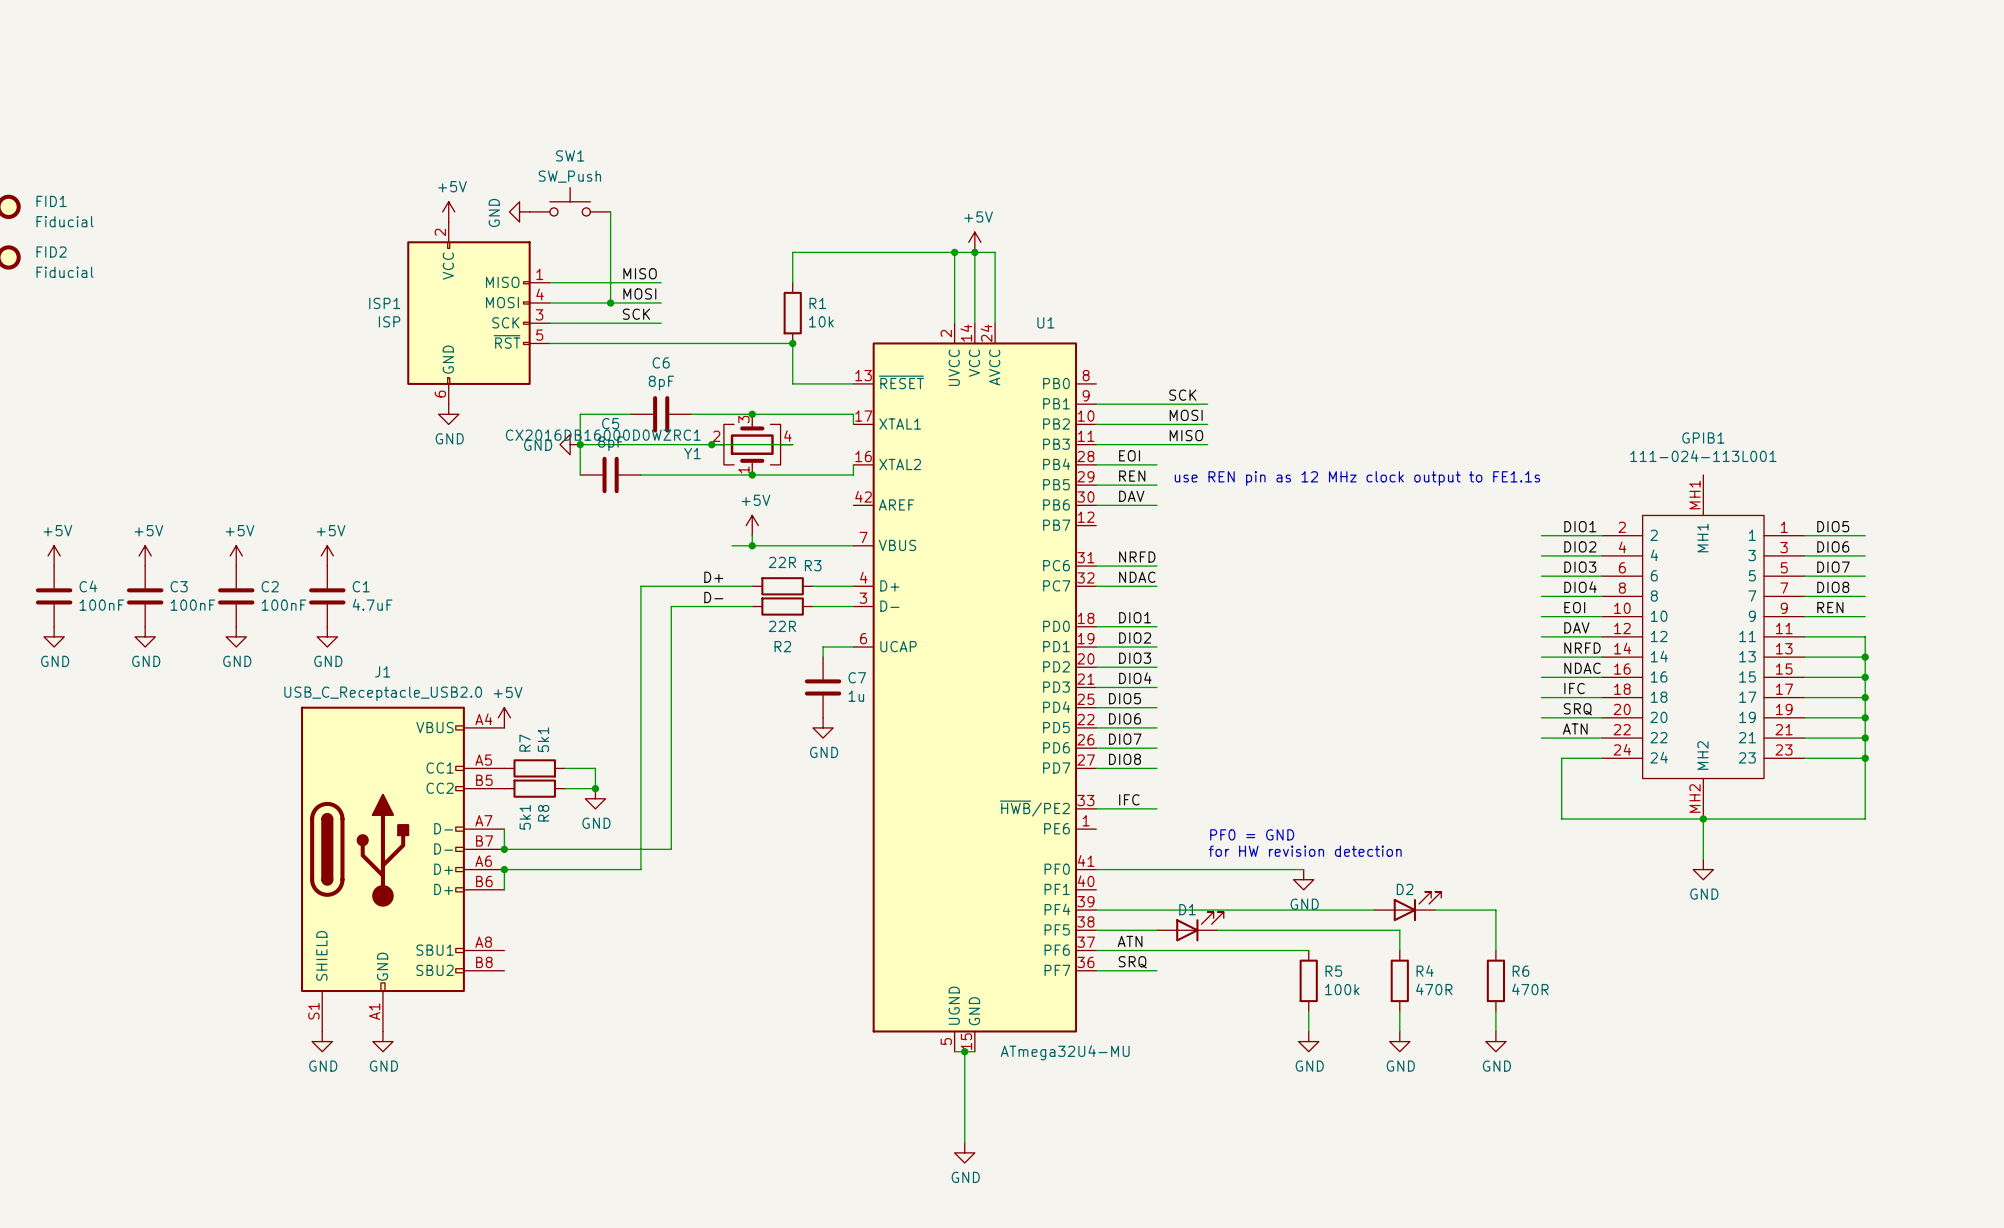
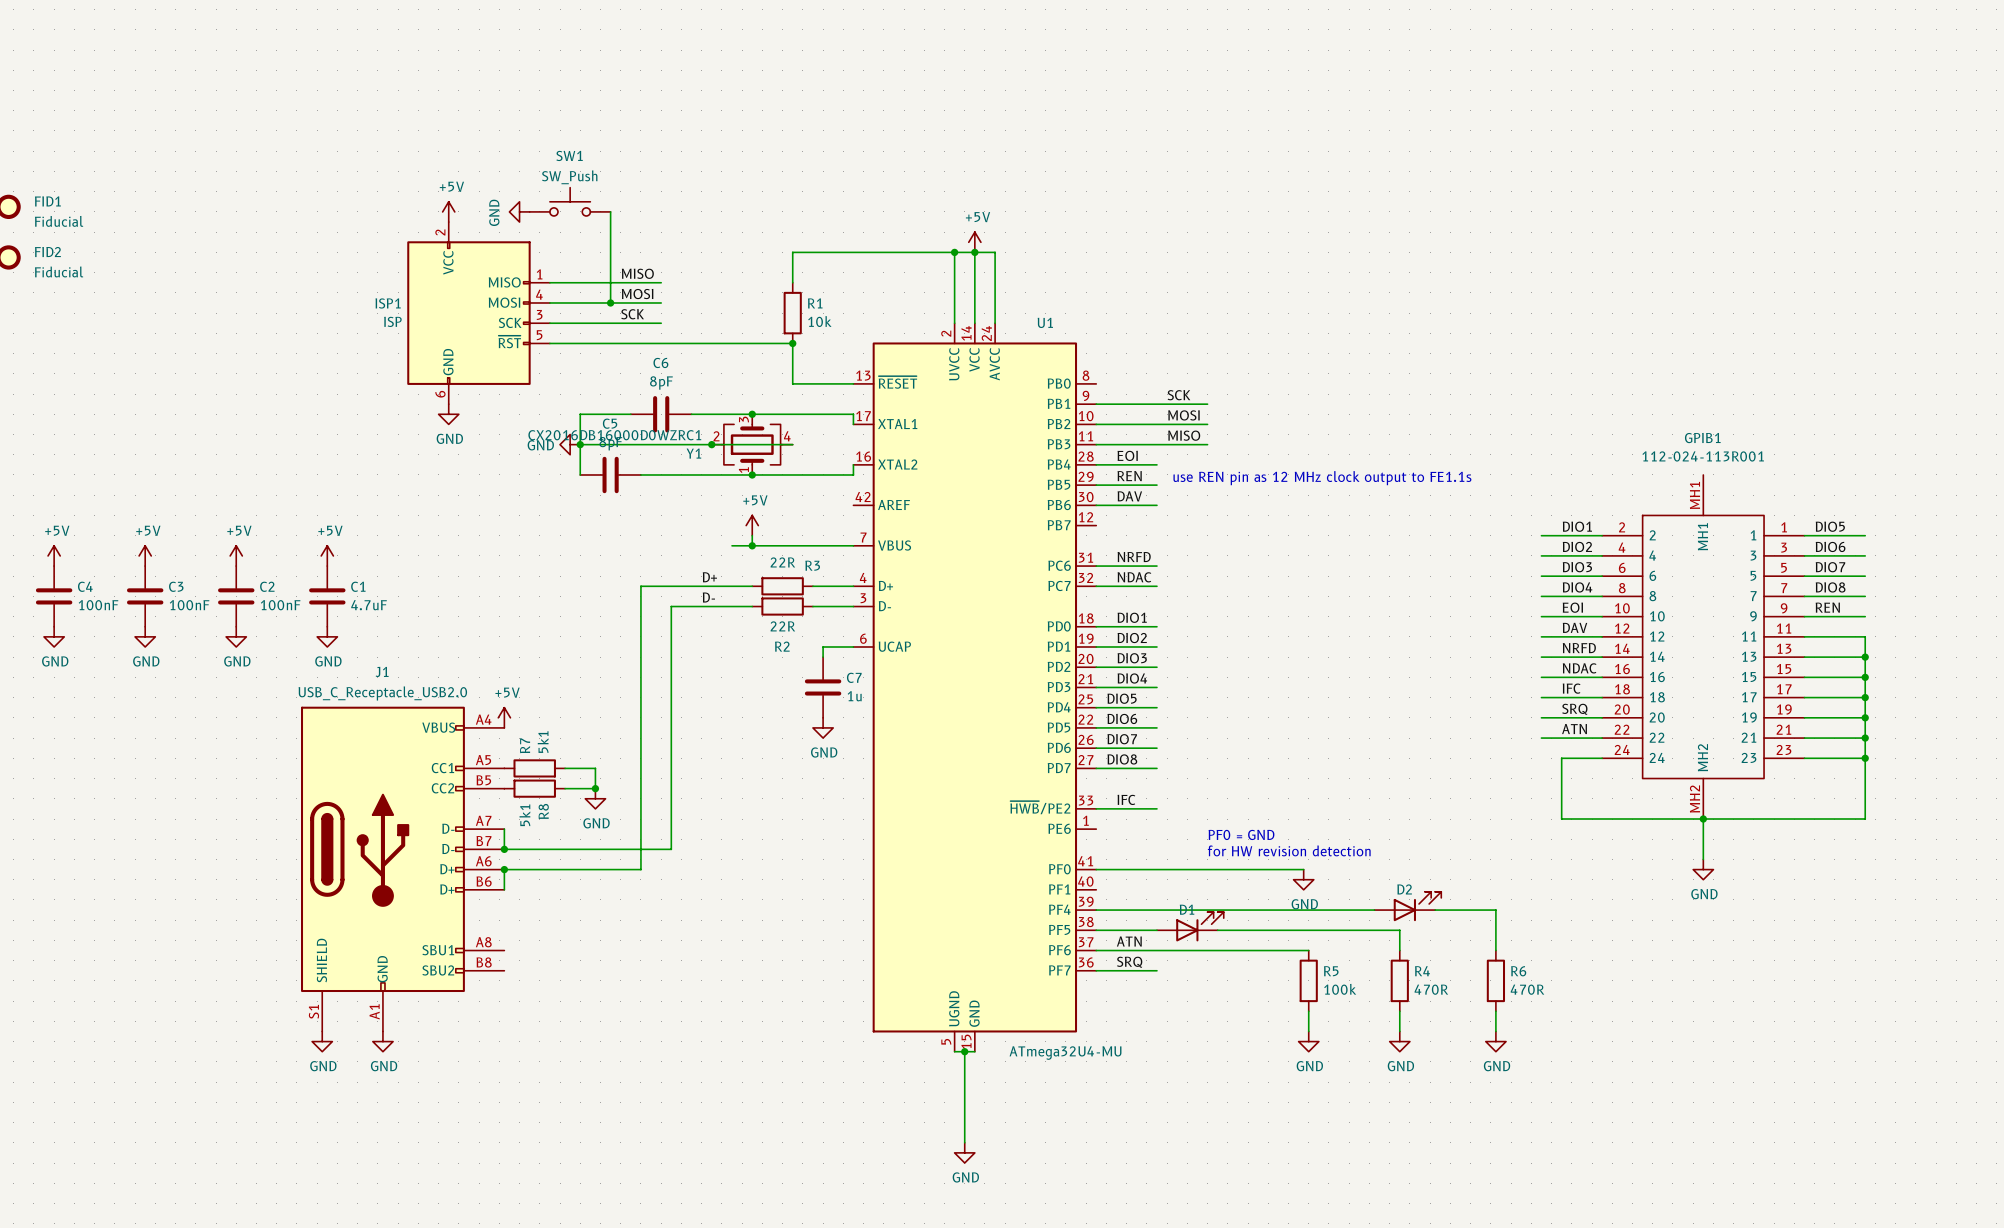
GPIB1 value: 111-024-113L001 (1703, 456) -> 112-024-113R001 (1703, 456)

